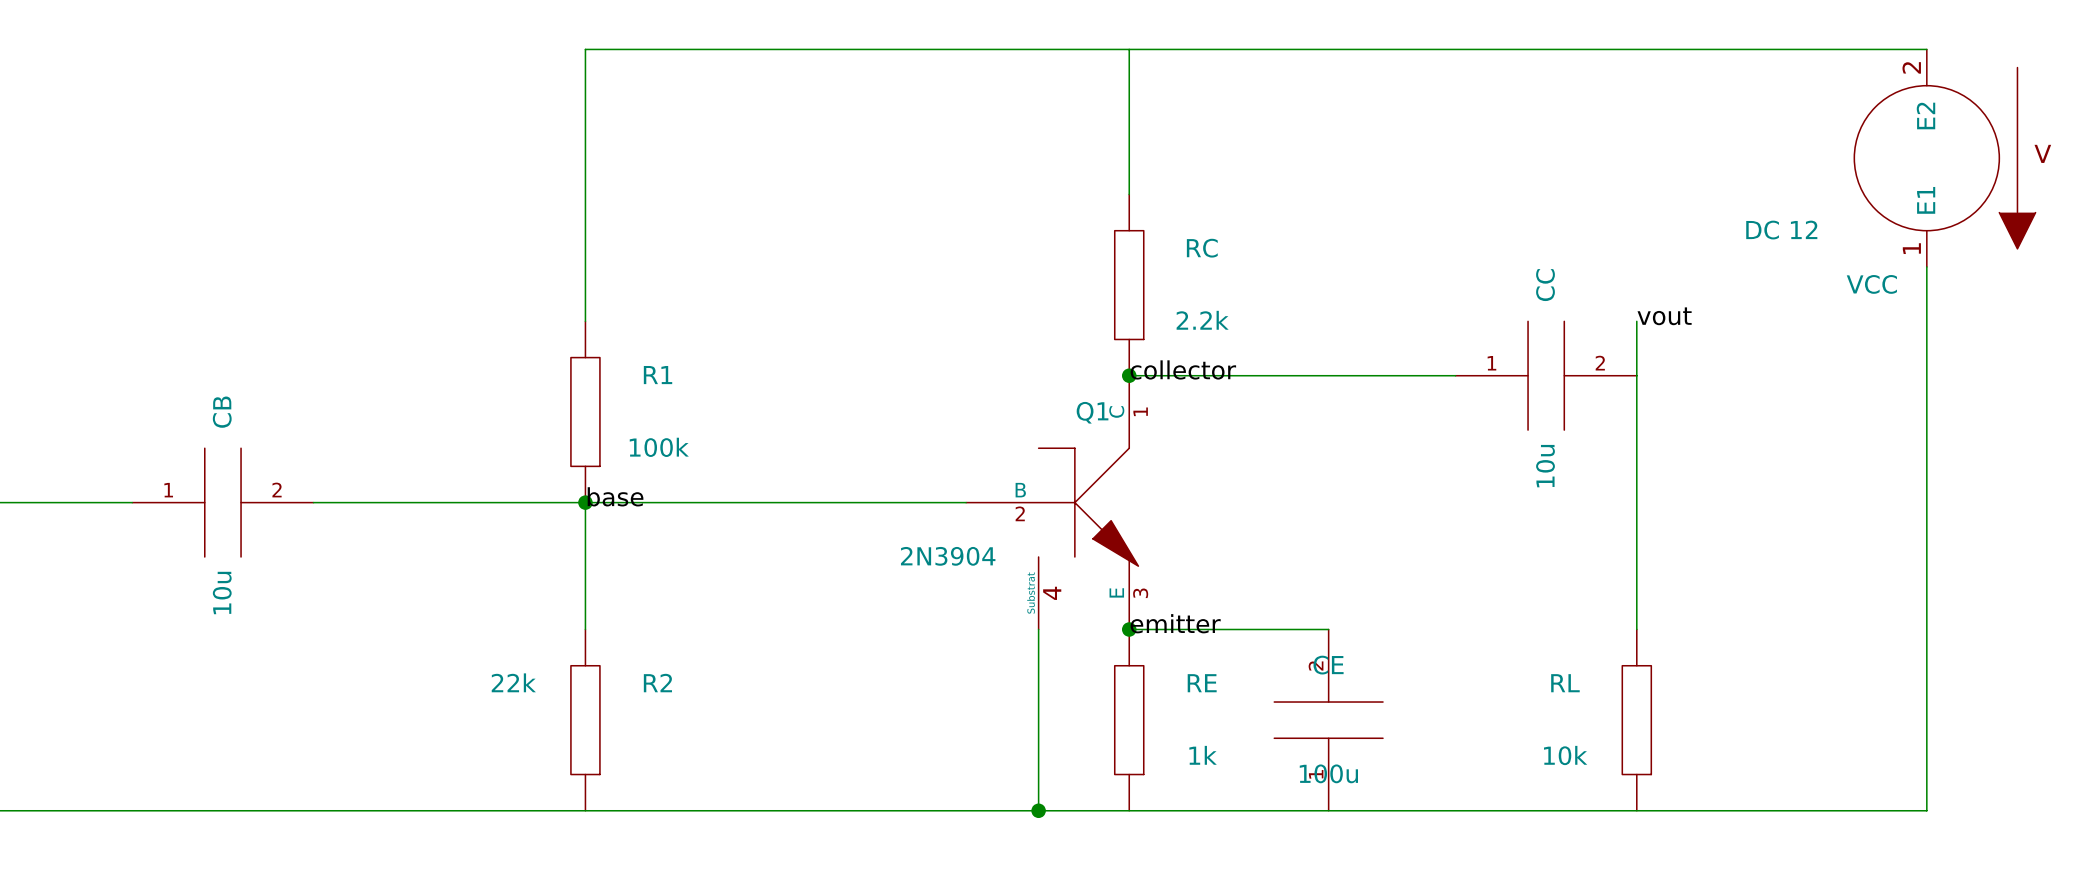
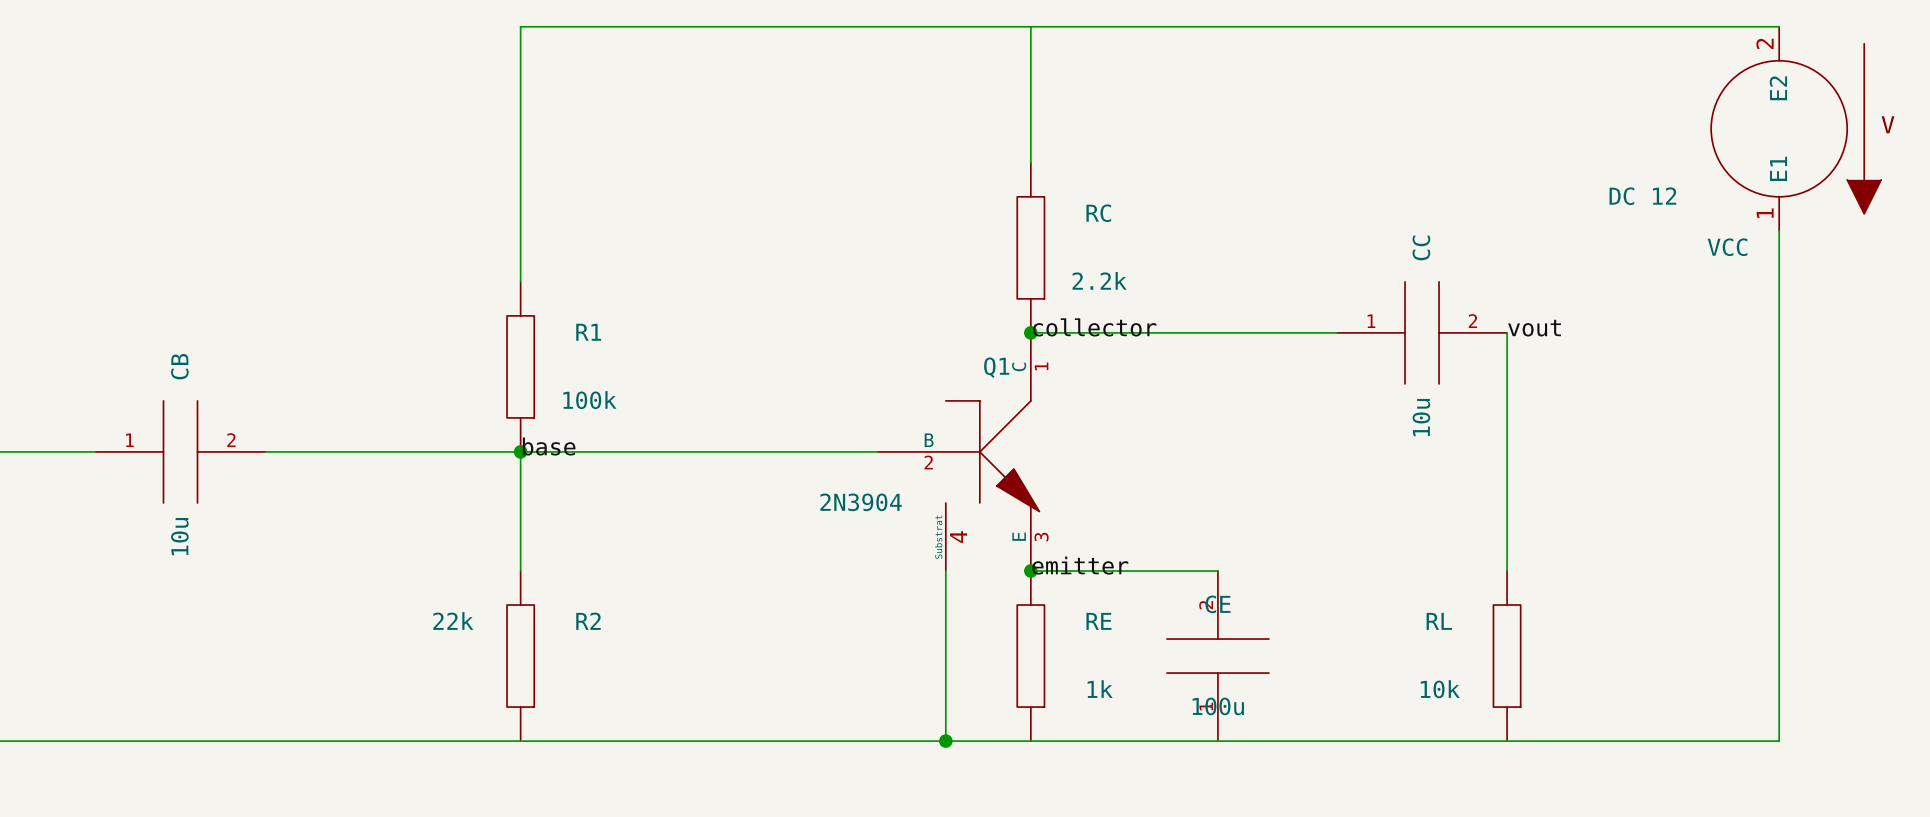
label position: vout (1664, 316) -> vout (1534, 328)
wire: (1636, 321) (1636, 375) -> none

